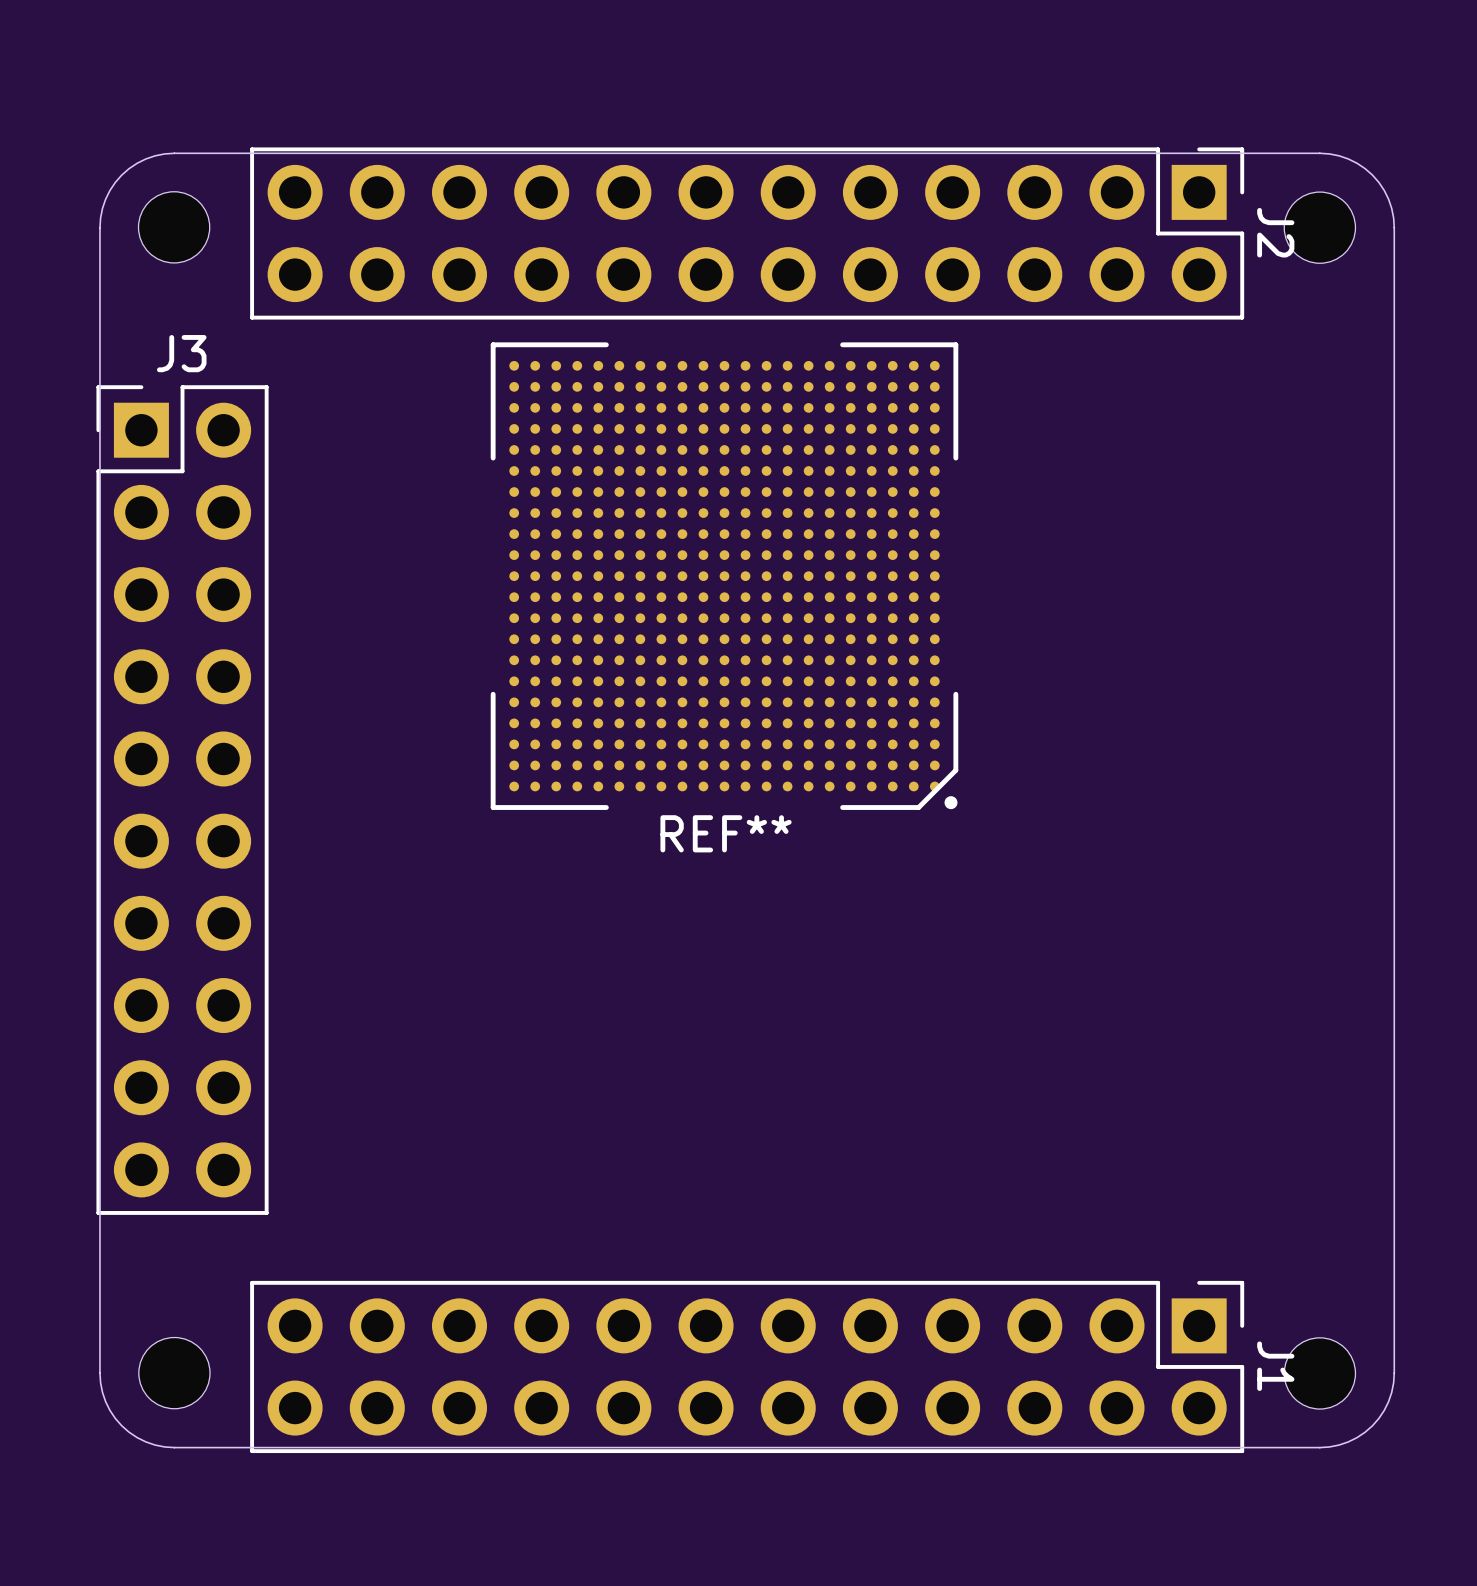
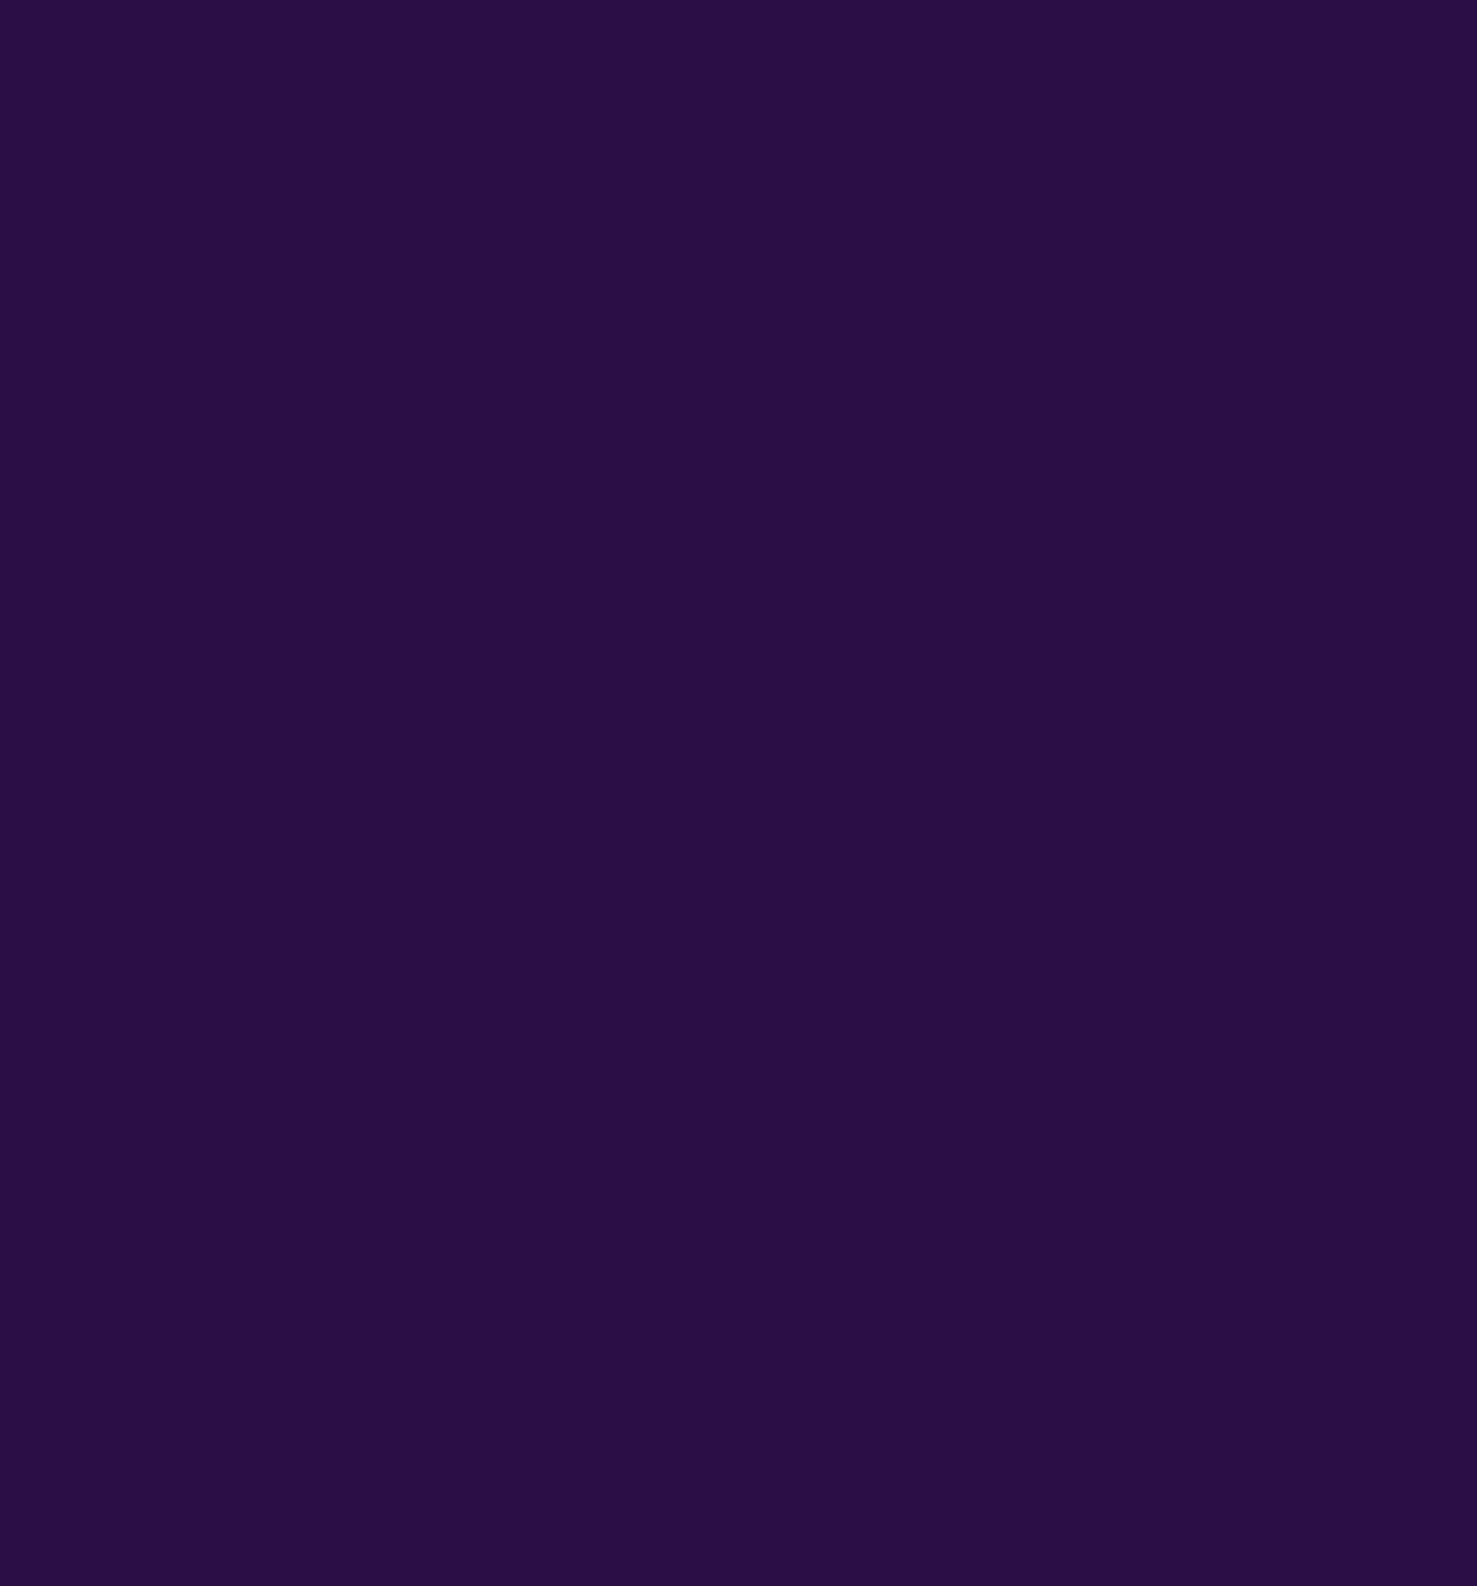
board edge: (1319, 153) (174, 153) (145, 158) (121, 175) (105, 199) (99, 227) (99, 1373) (105, 1401) (121, 1425) (145, 1441) (174, 1447) (1319, 1447) (1348, 1441) (1372, 1425) (1388, 1401) (1394, 1373) (1394, 227) (1388, 199) (1372, 175) (1348, 158) (1319, 153) -> none
part: (174, 227) -> none
part: (1319, 227) -> none
J2: (747, 233) -> none
REF**: (724, 576) -> none
J3: (182, 800) -> none
J1: (747, 1366) -> none
part: (174, 1373) -> none
part: (1319, 1373) -> none

